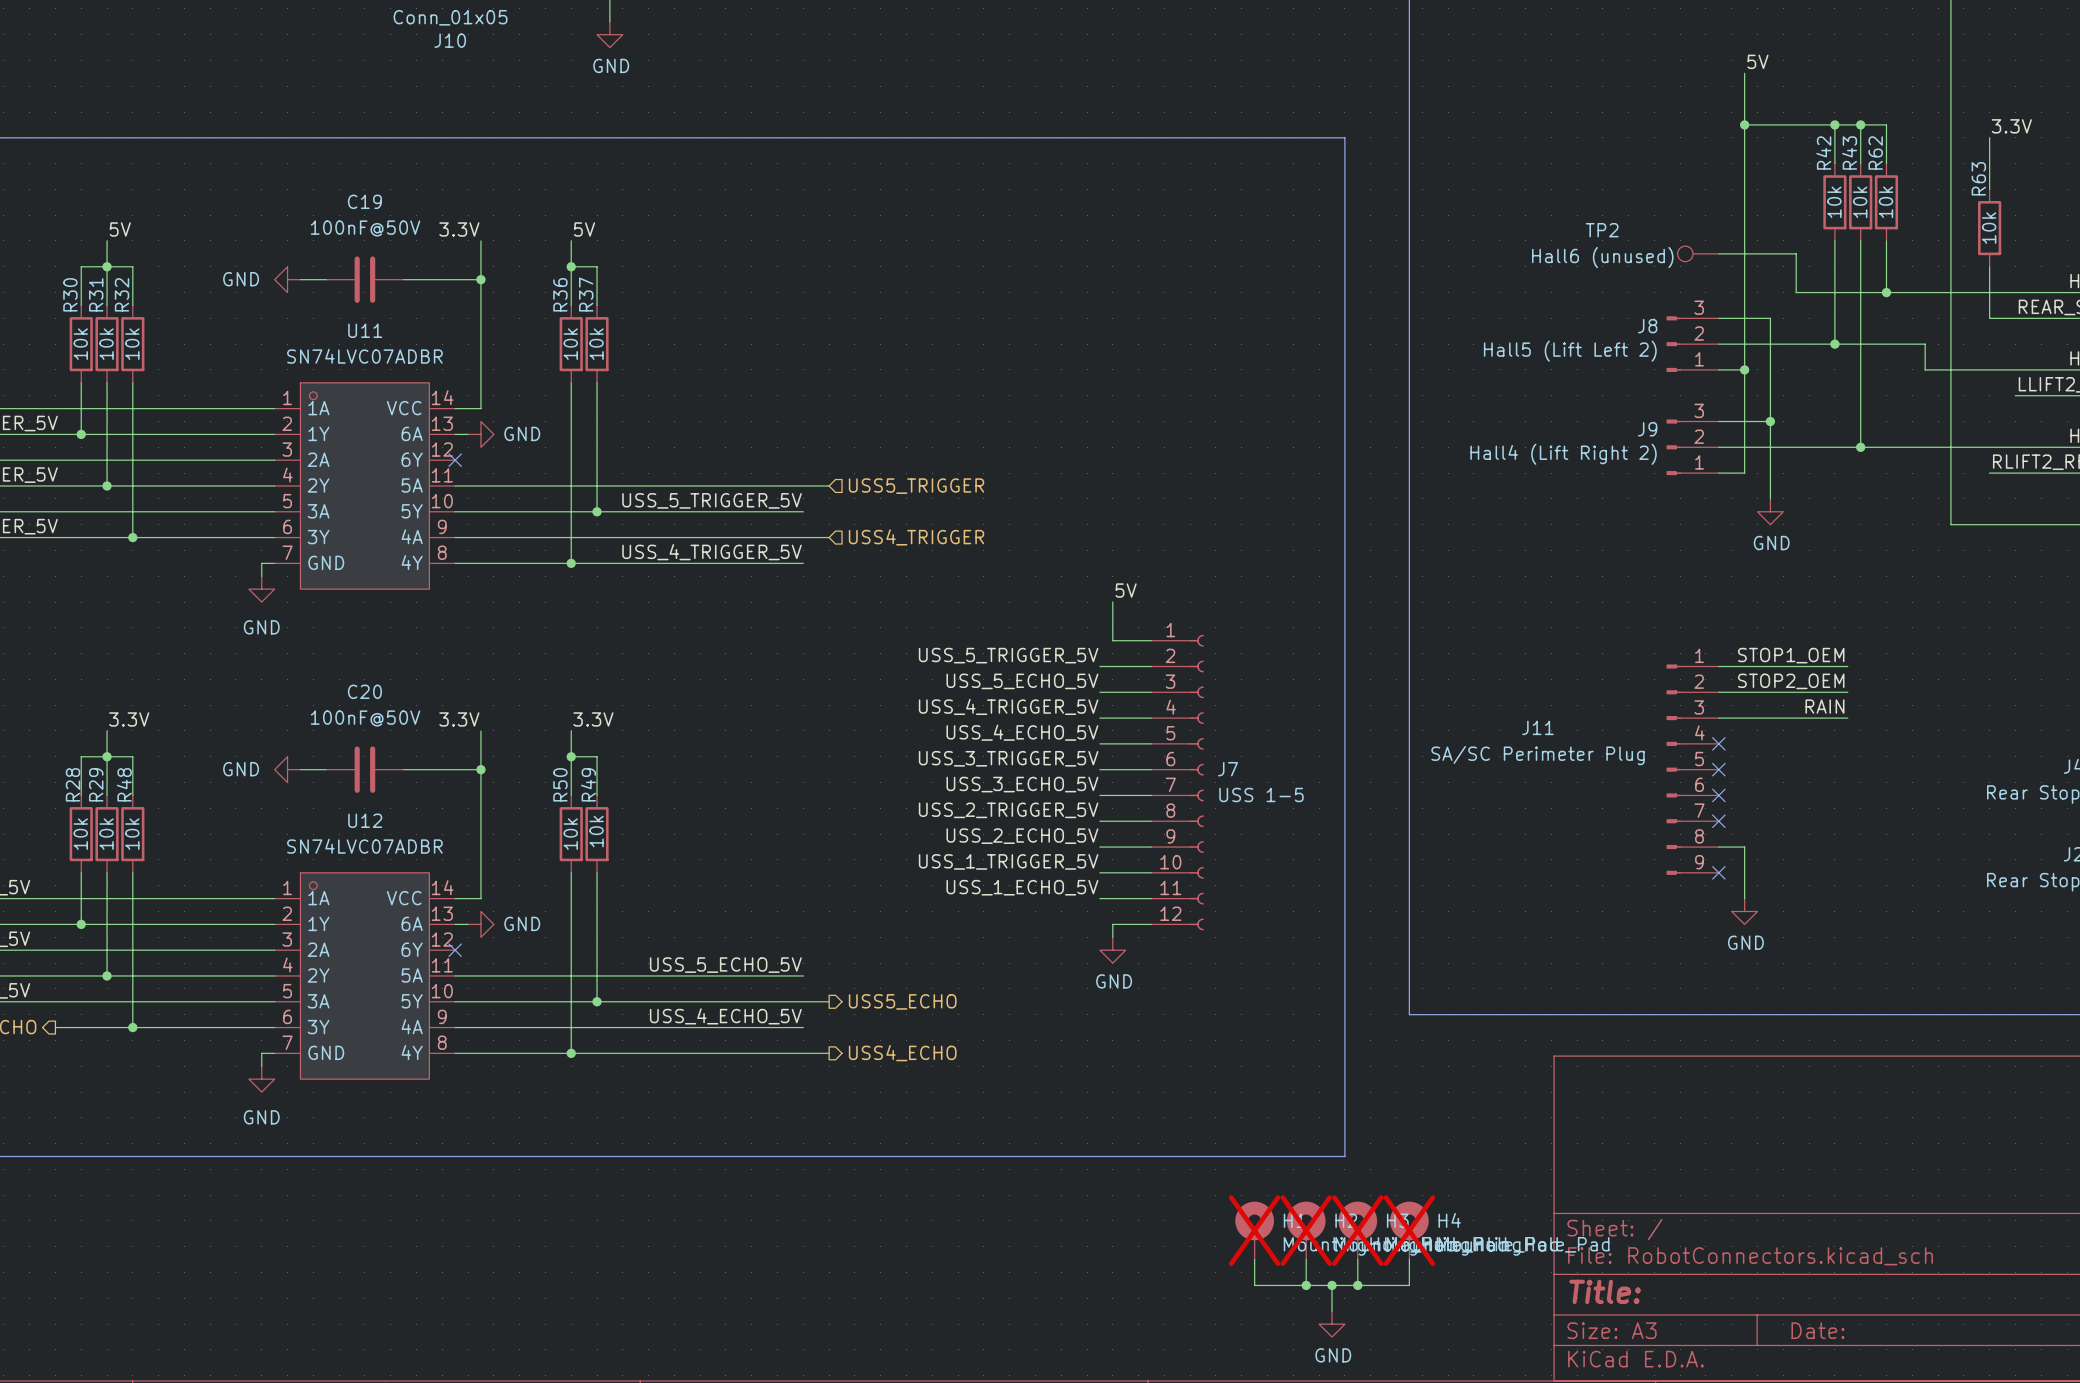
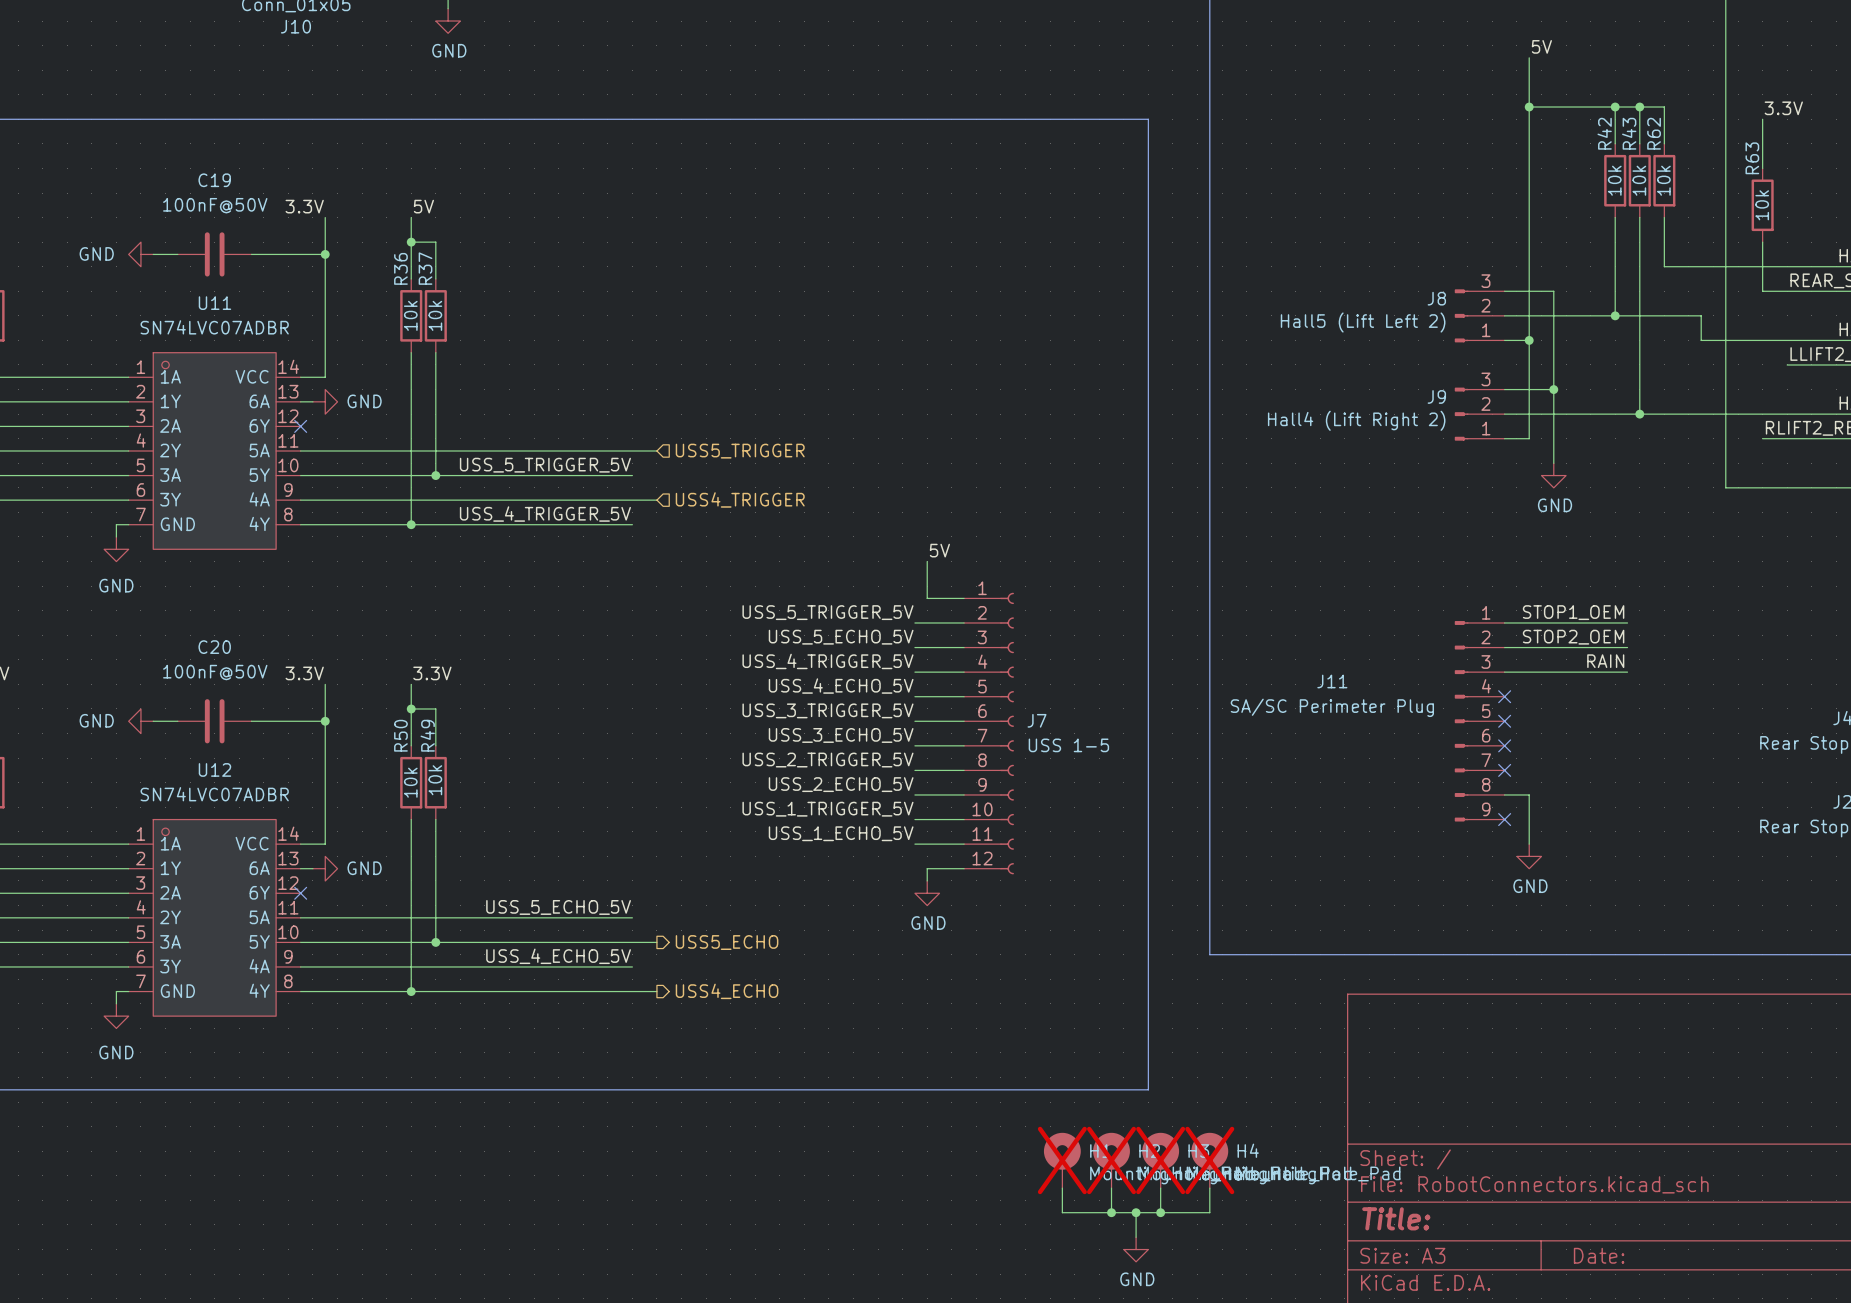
TP2: Hall6 (unused) (1698, 253) -> none
wire: (1718, 253) (1796, 253) (1796, 292) (1886, 292) -> none
junction: (1886, 292) -> none

